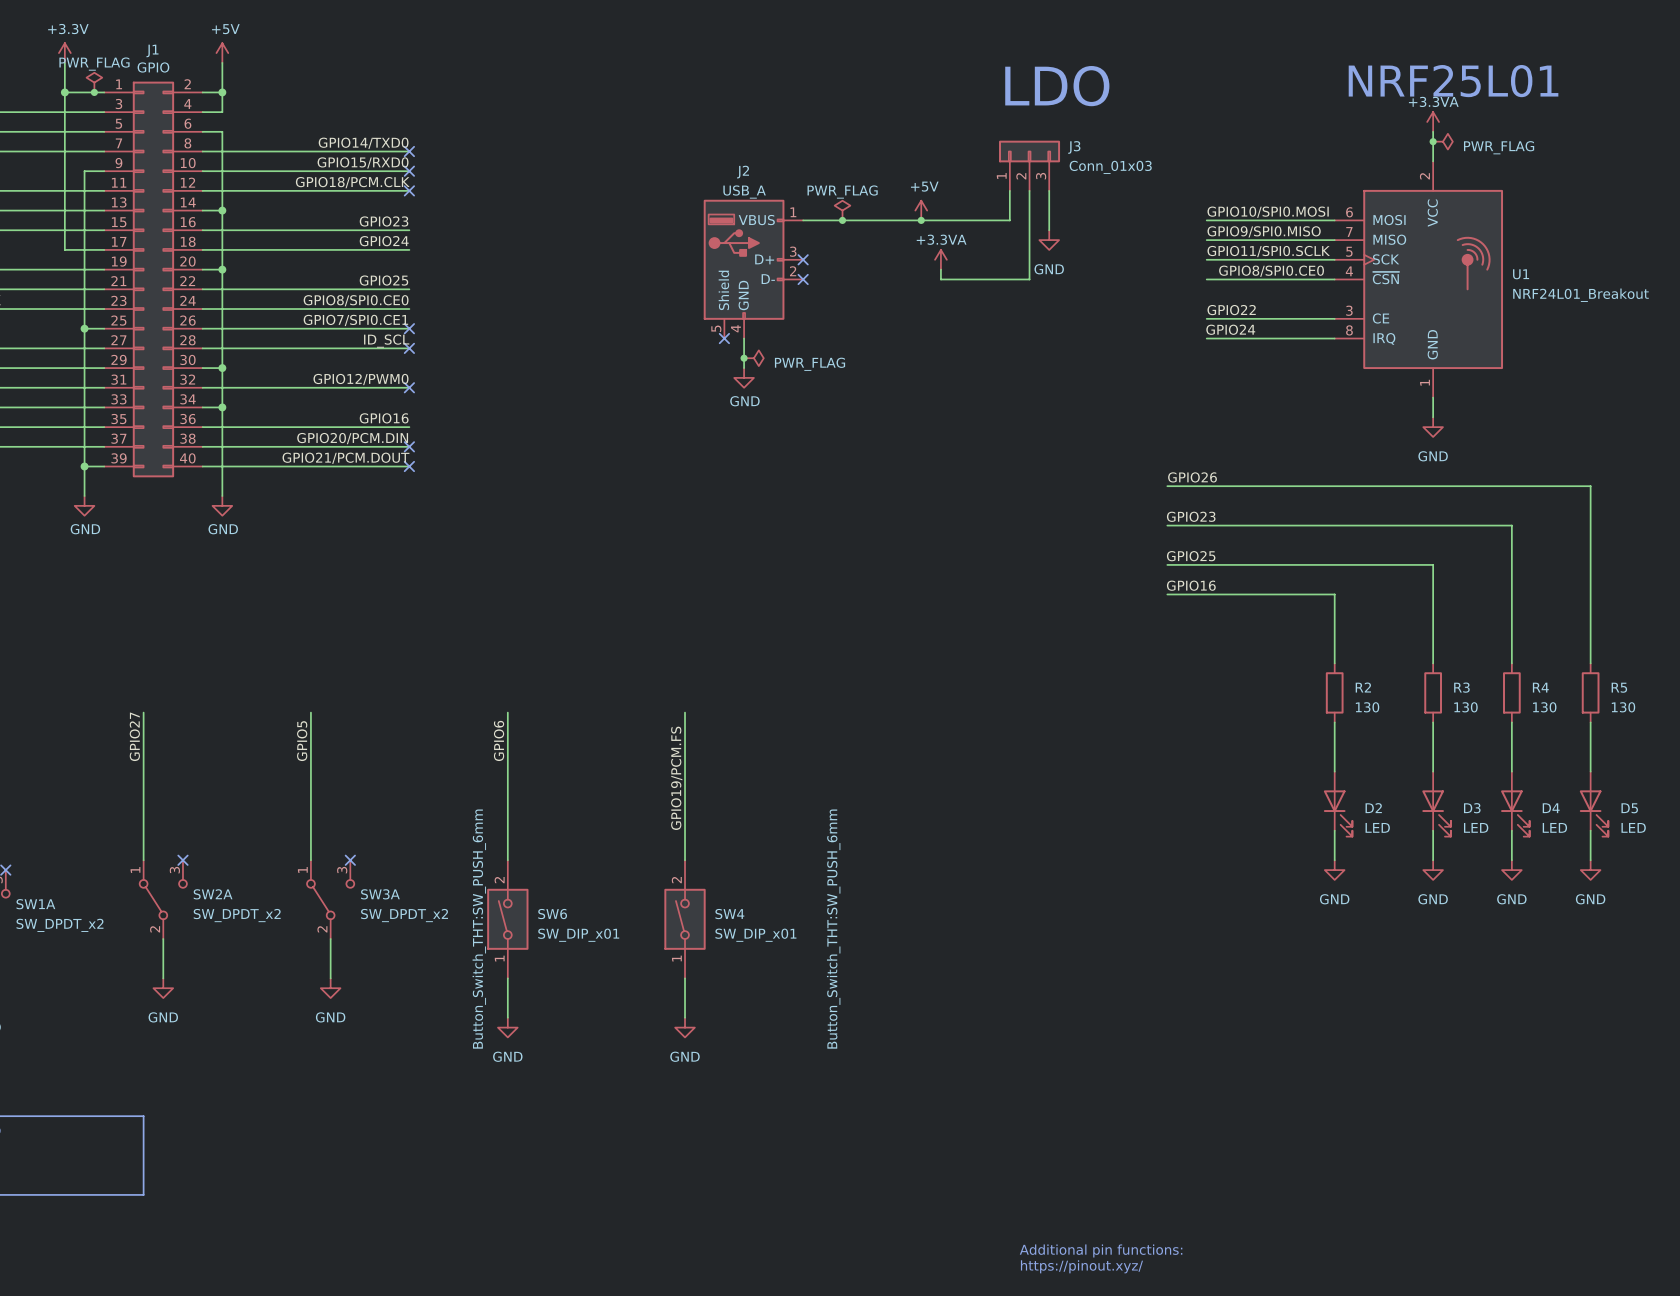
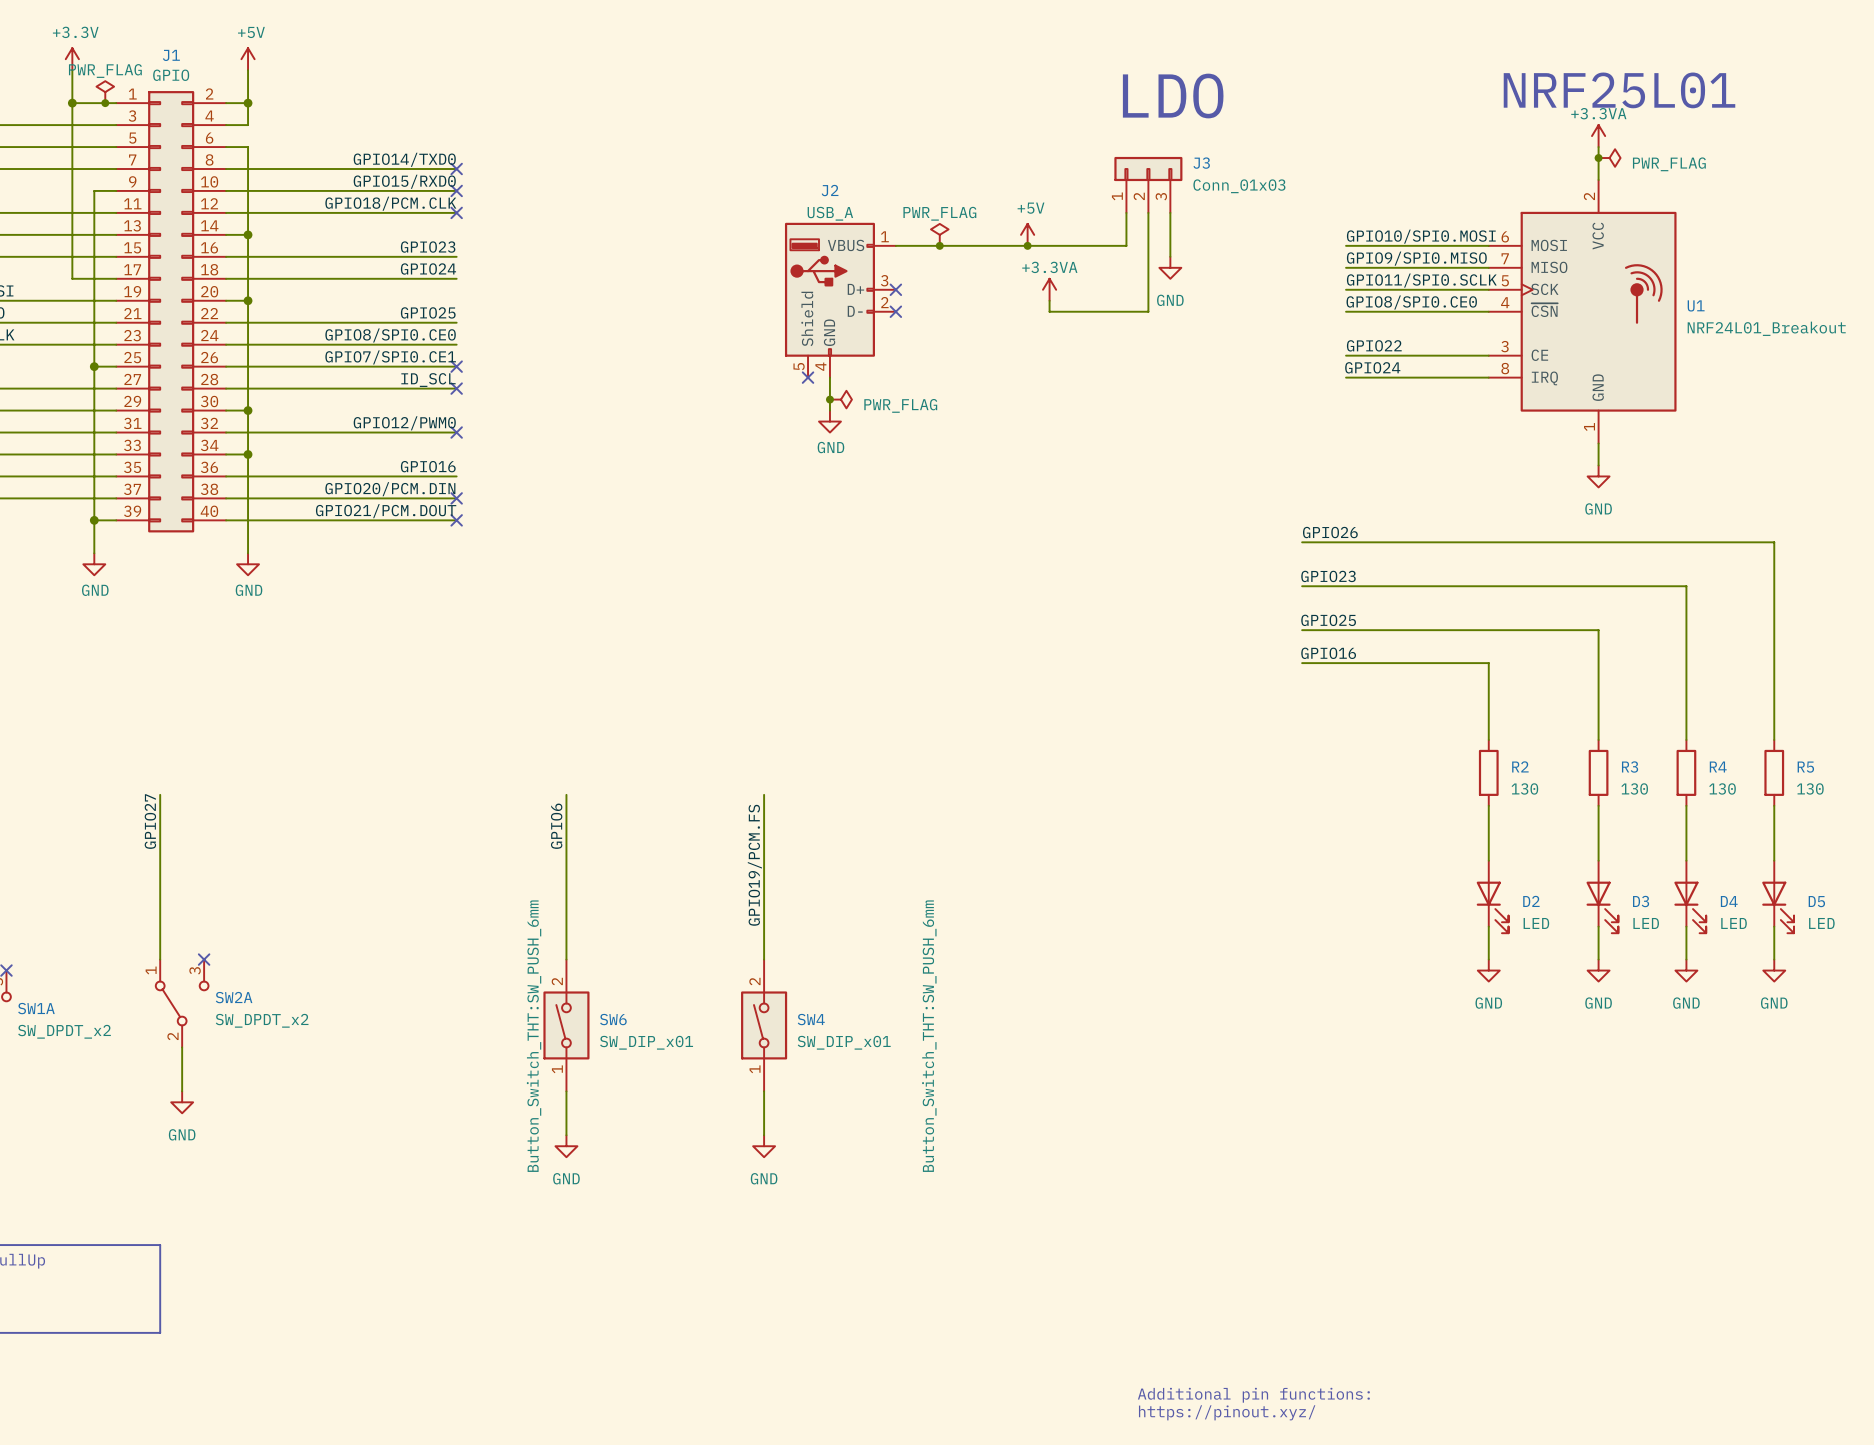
wire: (310, 712) (310, 860) -> none
label: GPIO5 (302, 741) -> none
no-connect mark: (350, 860) -> none
SW3A: SW_DPDT_x2 (330, 899) -> none
wire: (330, 939) (330, 978) -> none
power symbol: GND (330, 988) -> none

